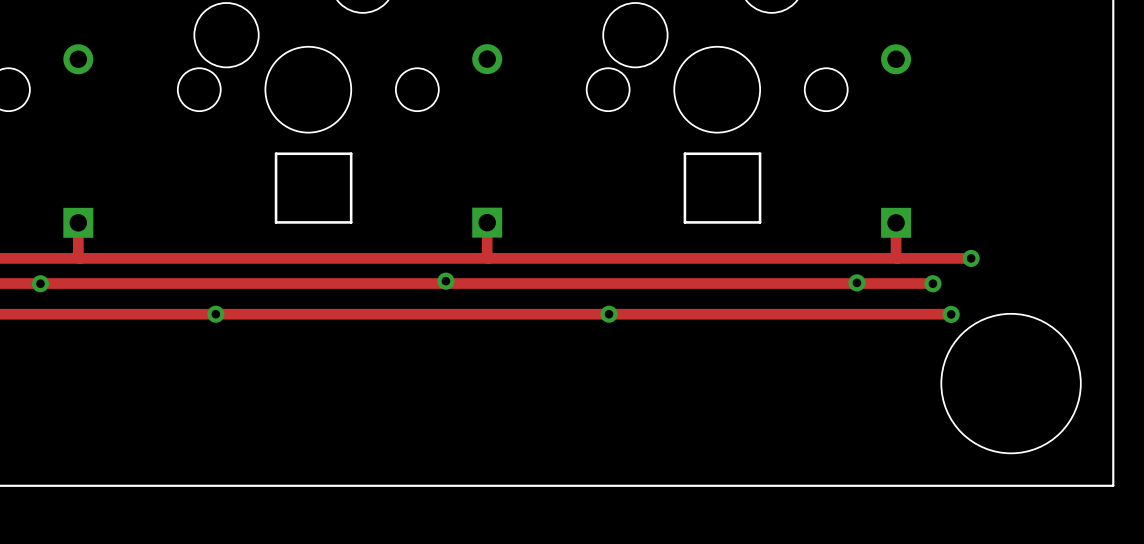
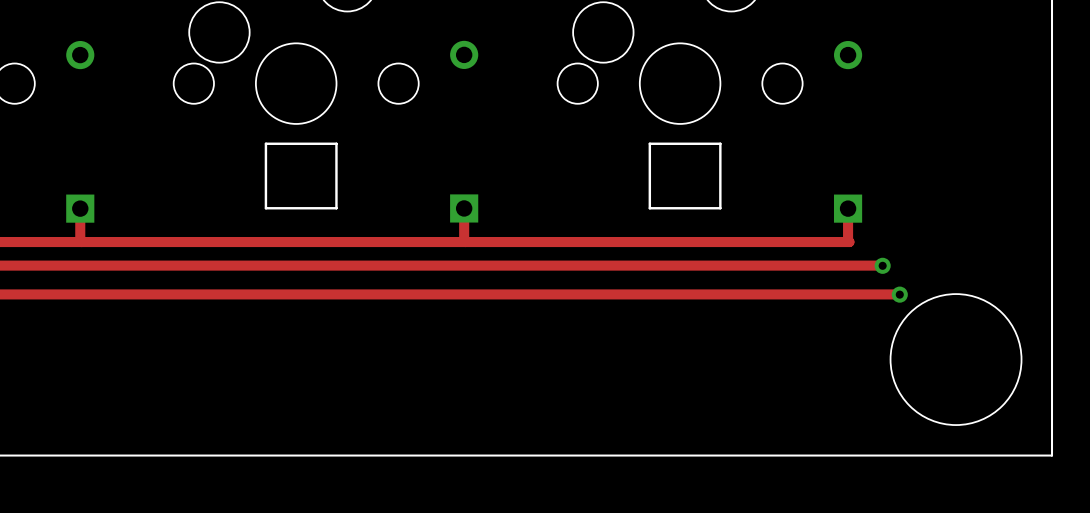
track: (897, 258) (971, 258) -> none
via: (971, 258) -> none
via: (445, 281) -> none
via: (856, 282) -> none
via: (40, 283) -> none
via: (215, 314) -> none
via: (609, 314) -> none

